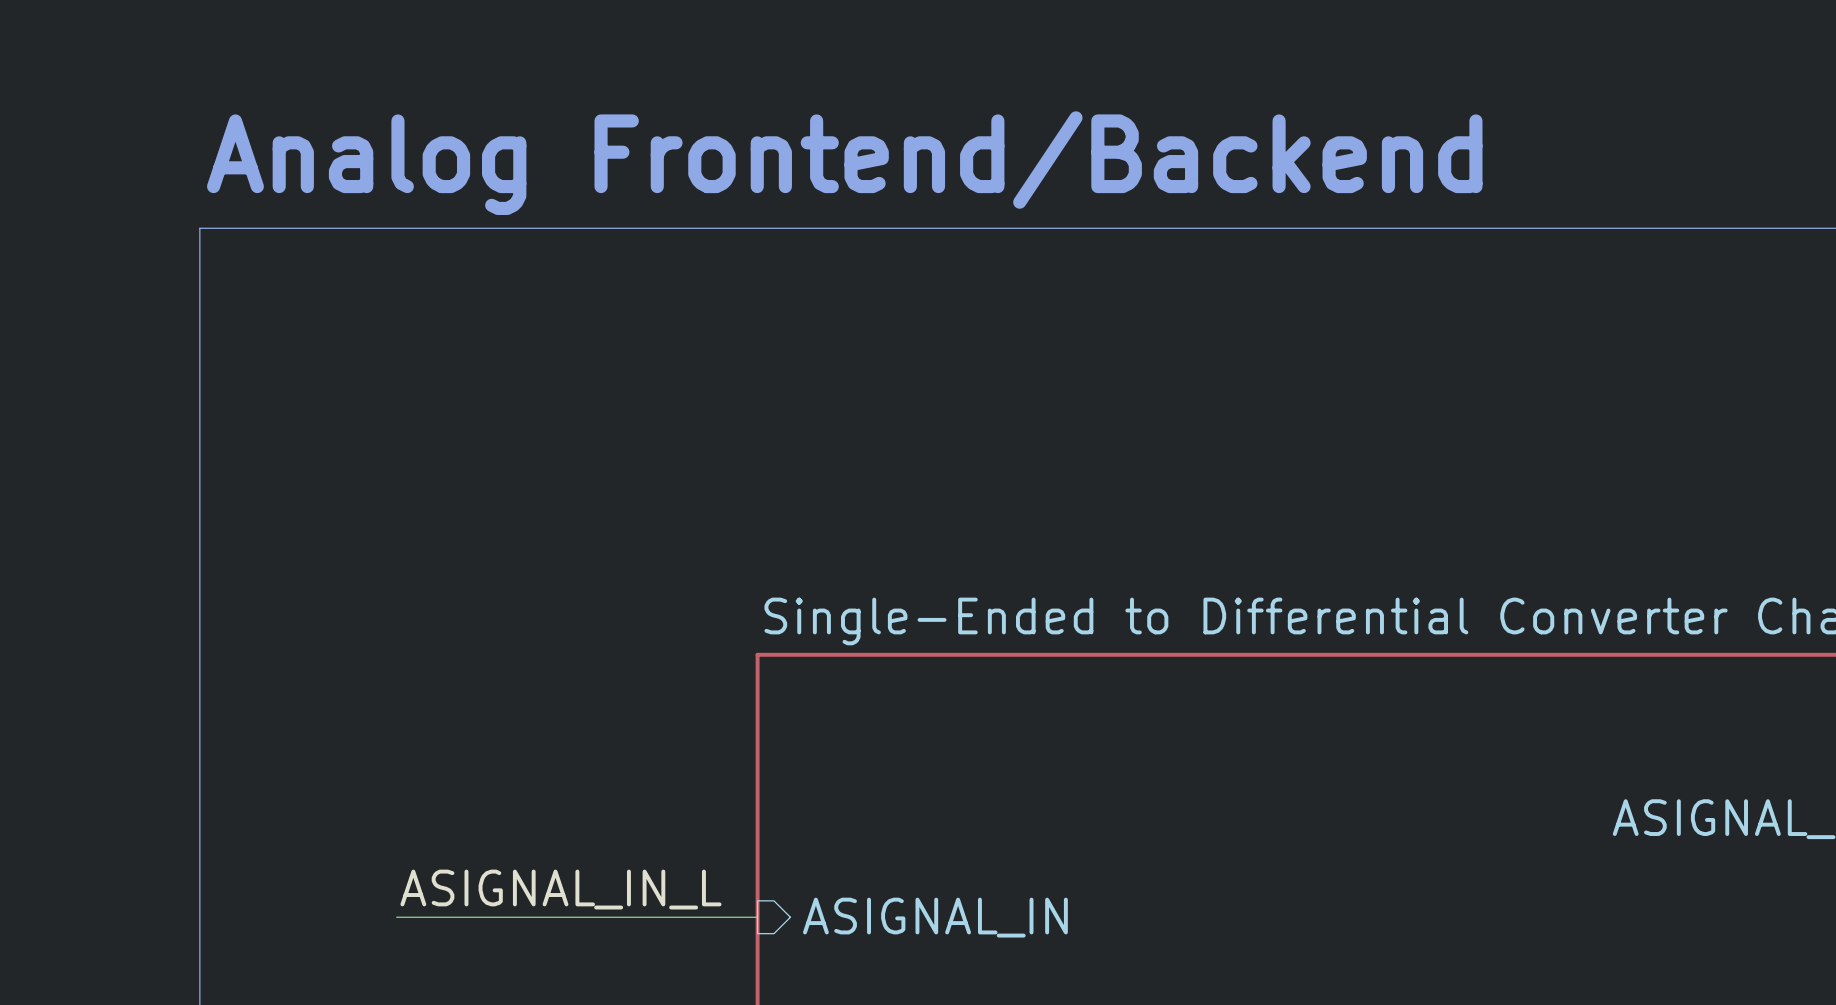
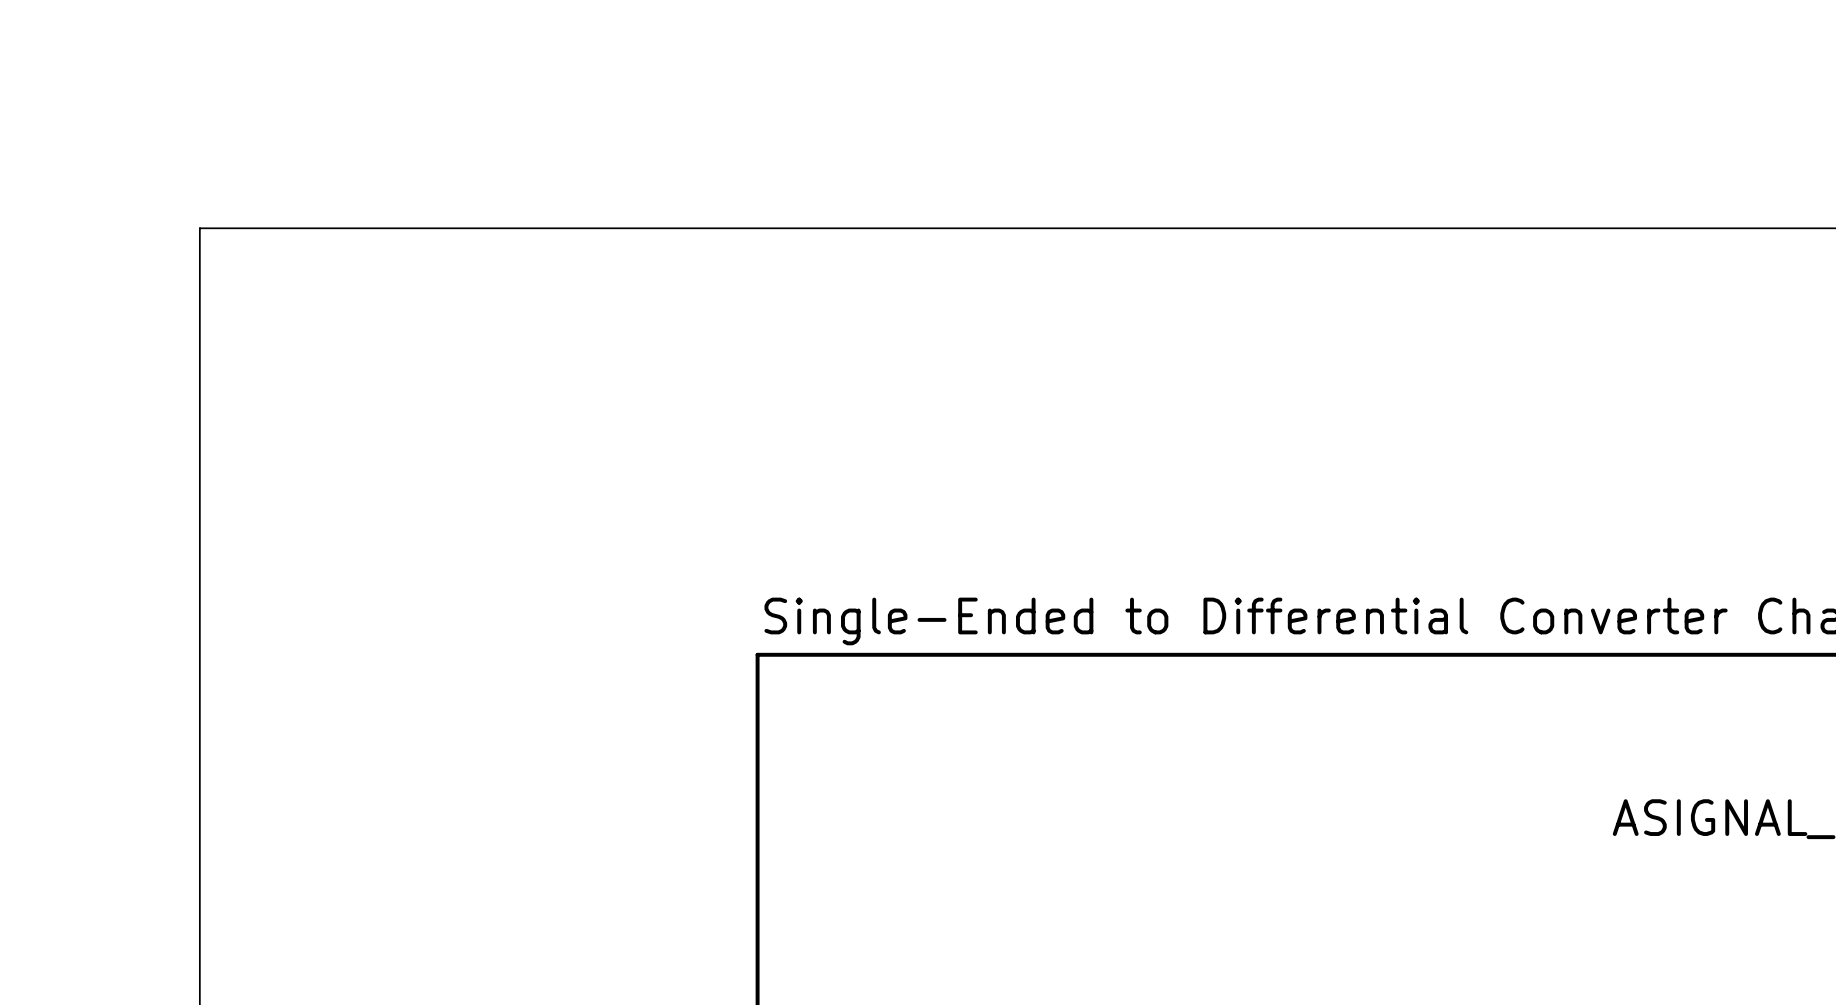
text: Analog Frontend/Backend (844, 163) -> none
label: ASIGNAL_IN_L (560, 889) -> none
wire: (396, 917) (757, 917) -> none
sheet pin: ASIGNAL_IN (935, 917) -> none

